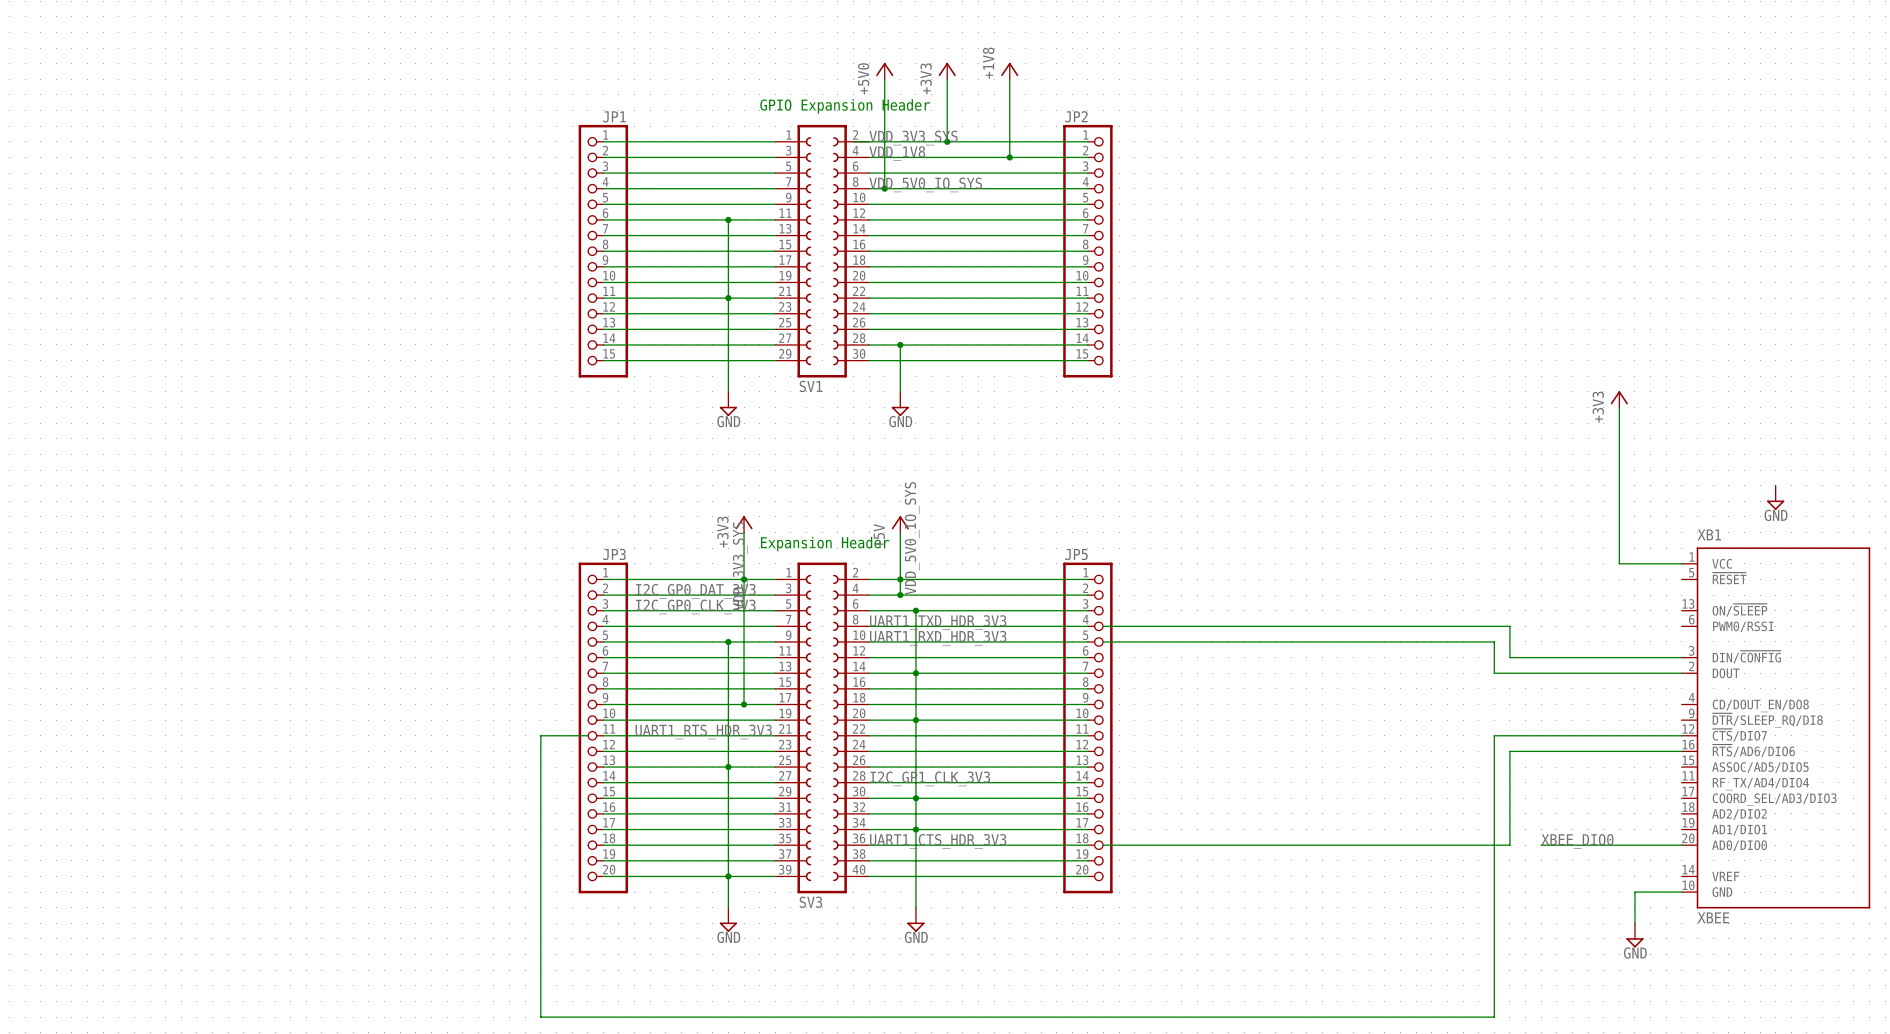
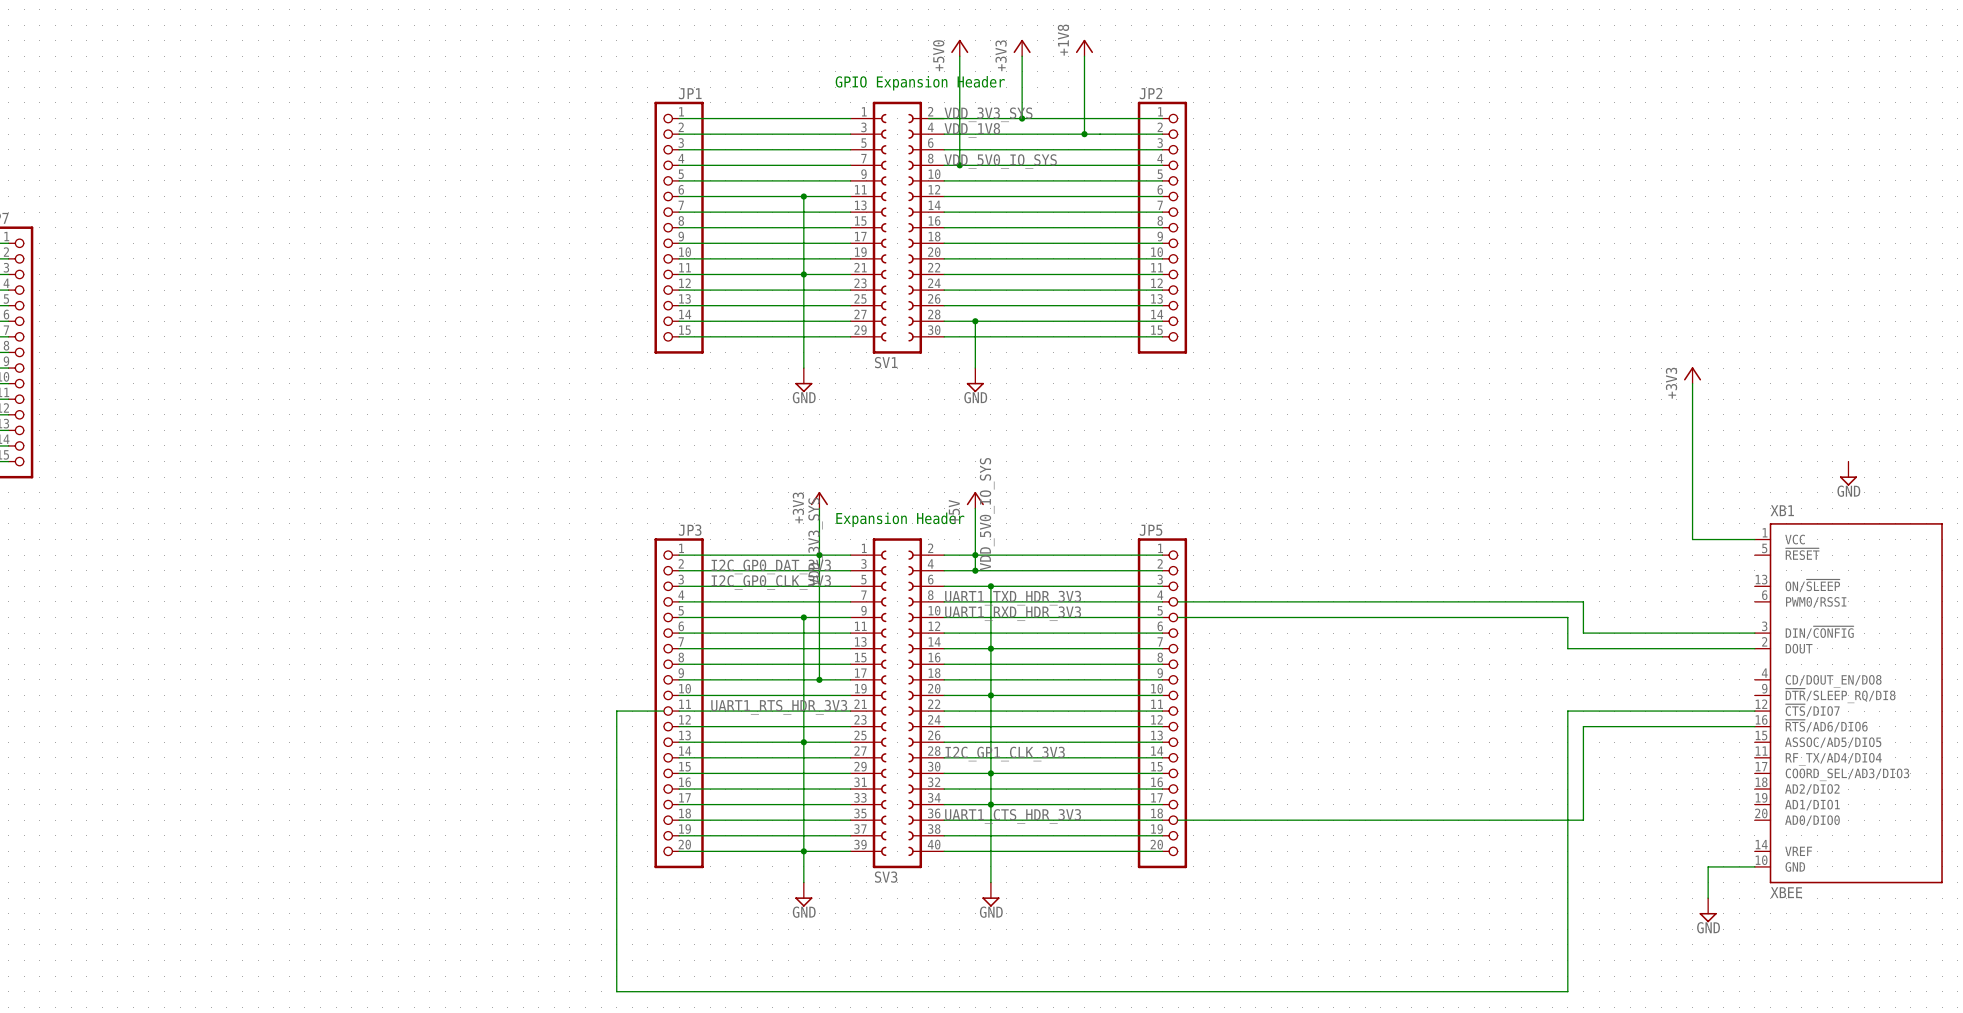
label: XBEE_DIO0 (1577, 841) -> none
wire: (1541, 845) (1681, 845) -> none

